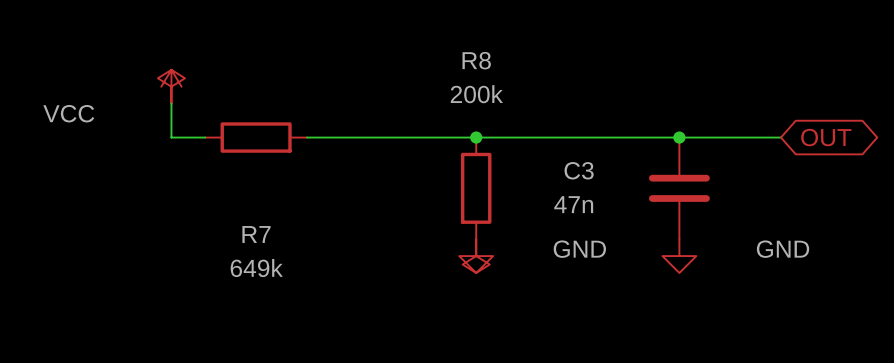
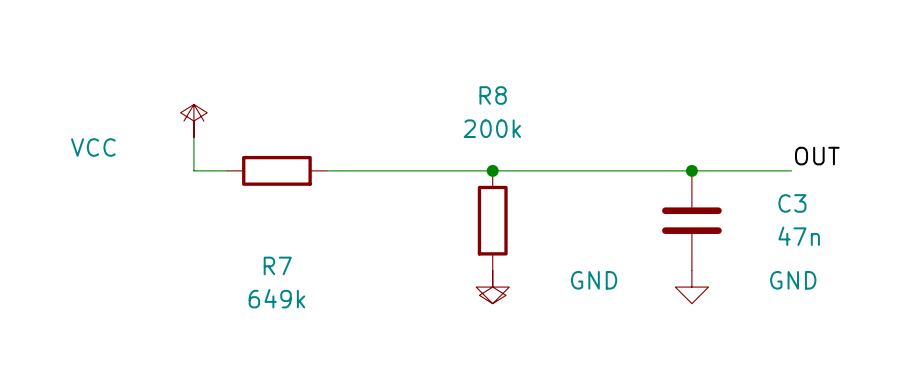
label: none -> OUT (817, 156)
global label: OUT (826, 137) -> none
C3 name position: C3 (579, 170) -> C3 (792, 203)
C3 value position: 47n (573, 204) -> 47n (799, 236)

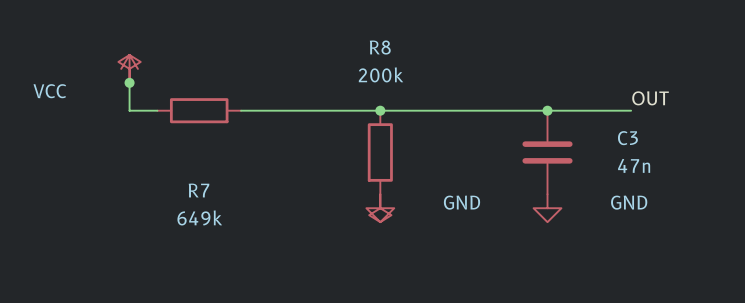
junction: none -> (129, 82)

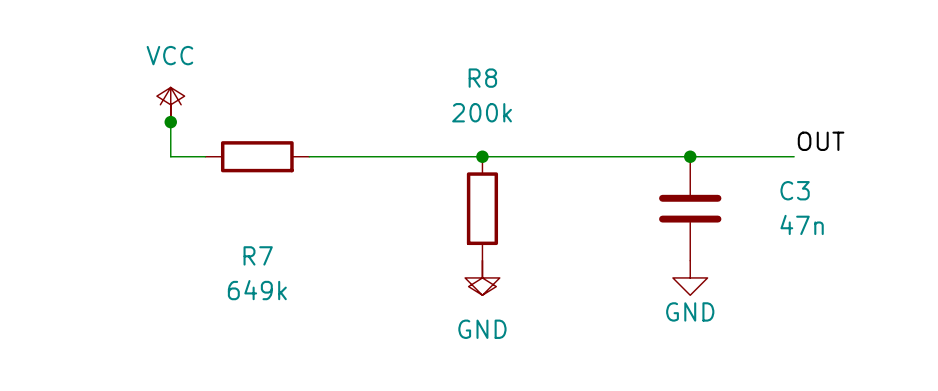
power symbol text position: VCC (49, 91) -> VCC (169, 55)
power symbol text position: GND (461, 202) -> GND (482, 329)
power symbol text position: GND (629, 202) -> GND (690, 311)

